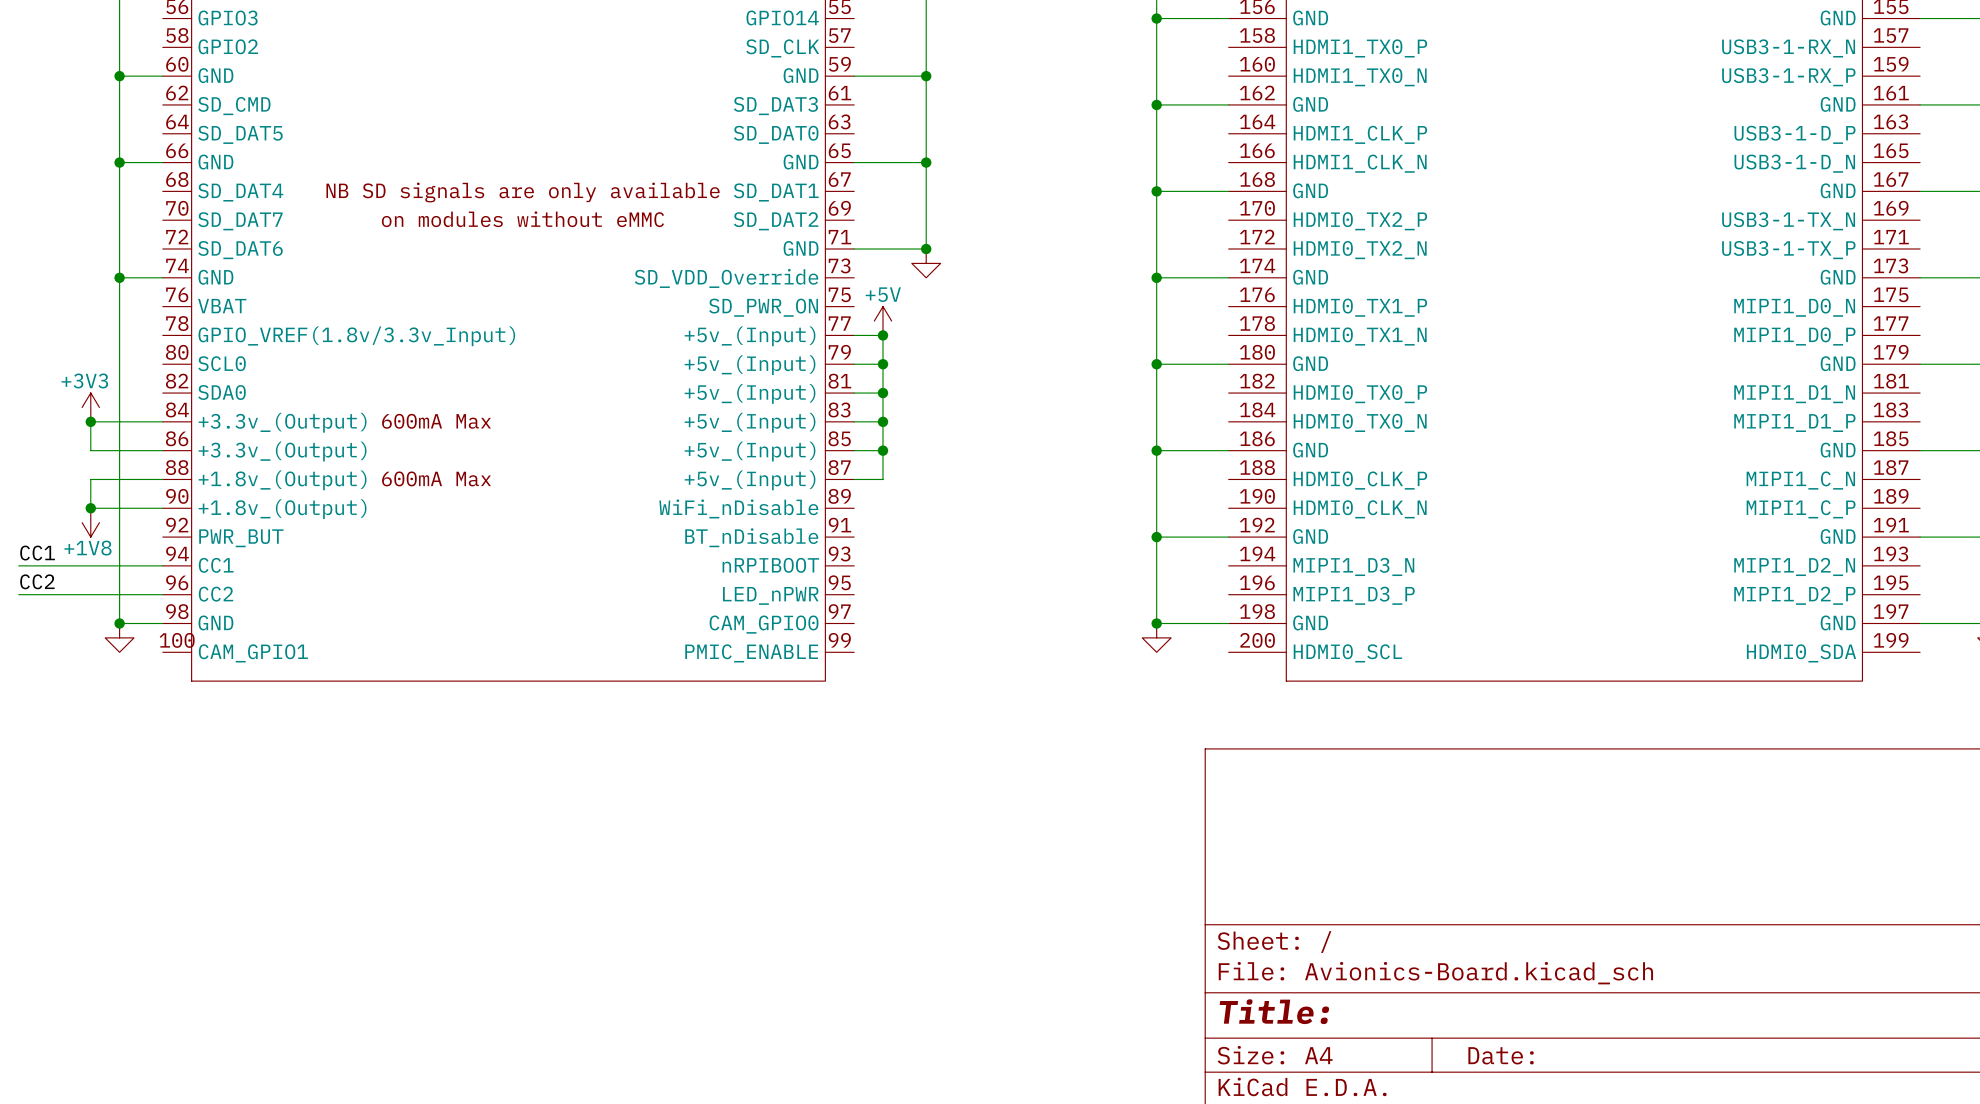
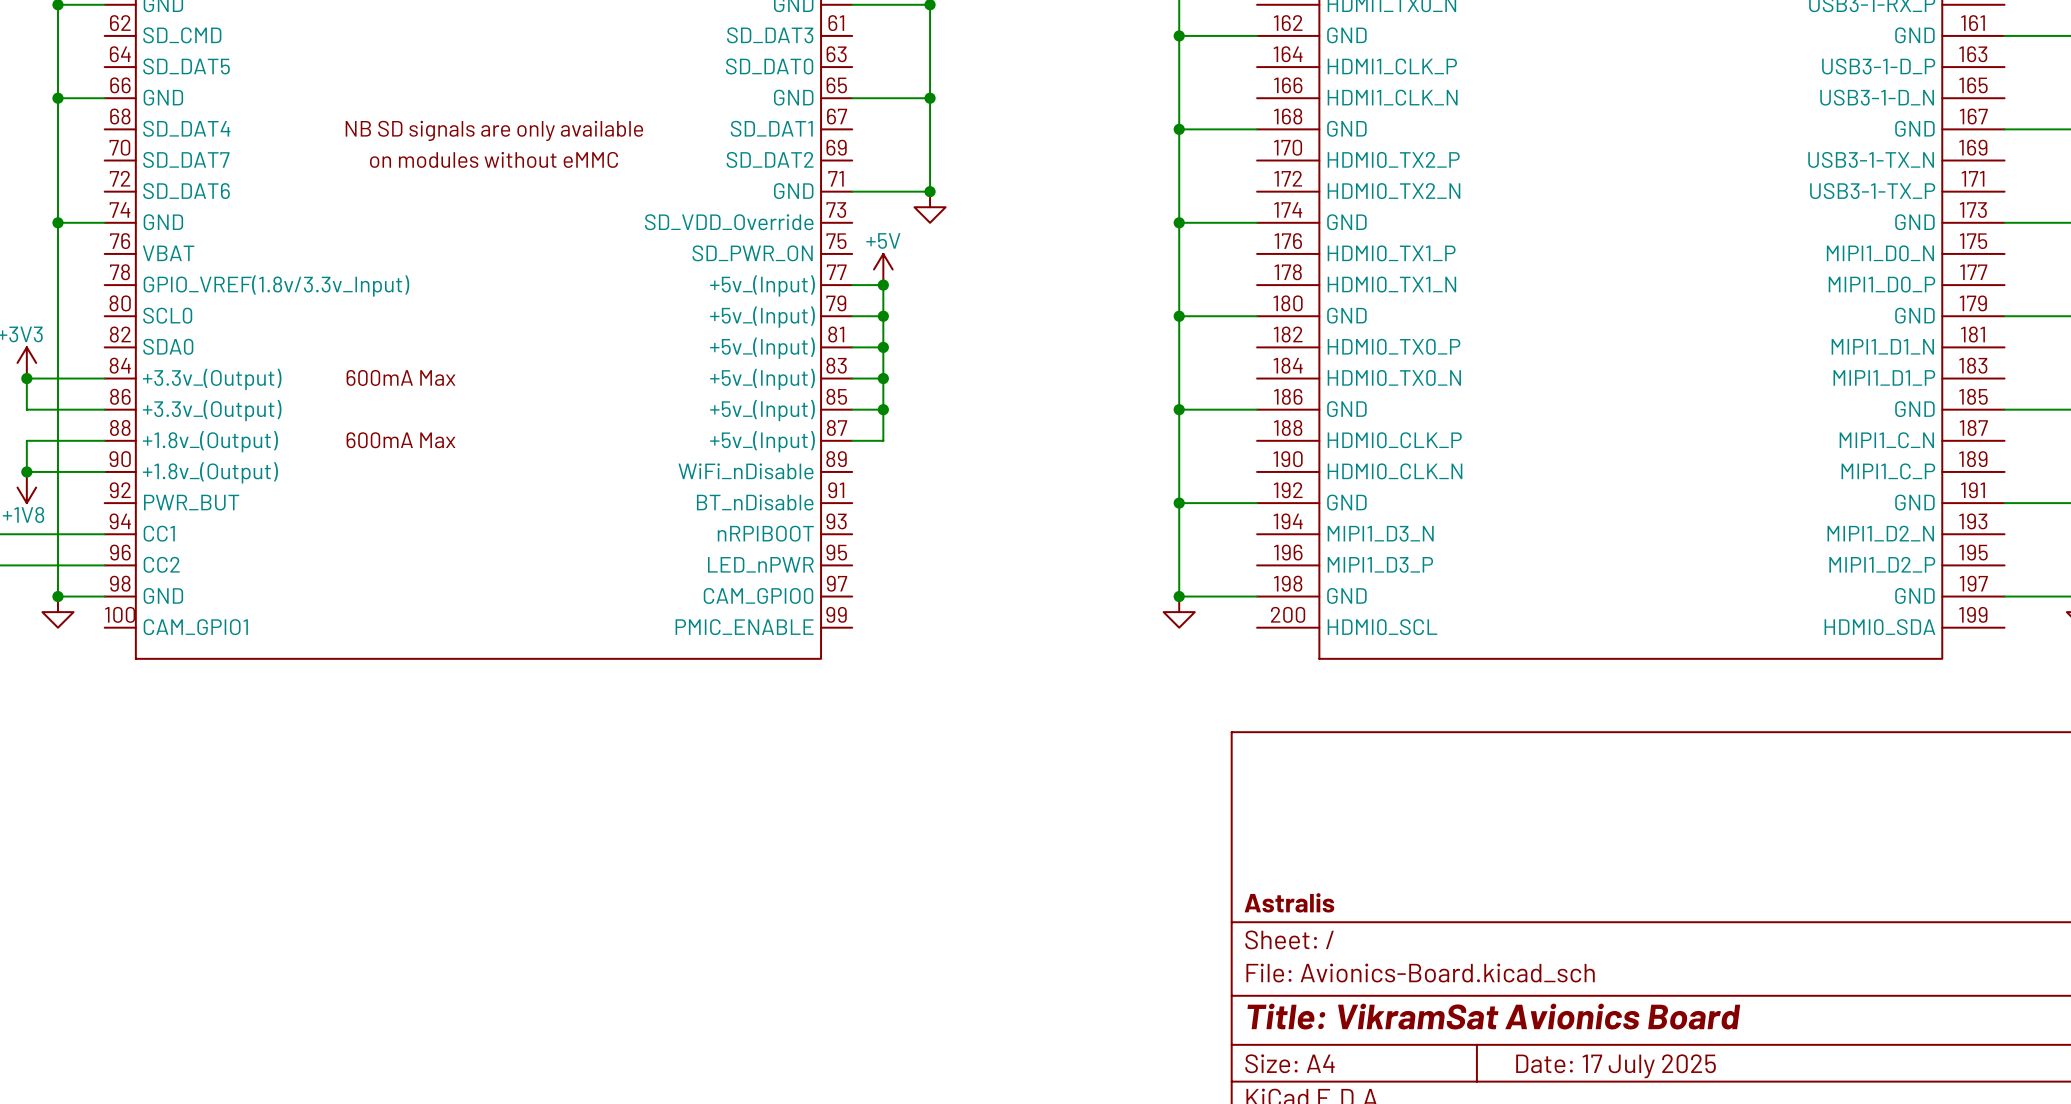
title block: none -> Astralis (1289, 902)
title block: Title: (1274, 1011) -> Title: VikramSat Avionics Board (1493, 1016)
title block: Date: (1501, 1055) -> Date: 17 July 2025 (1616, 1066)

